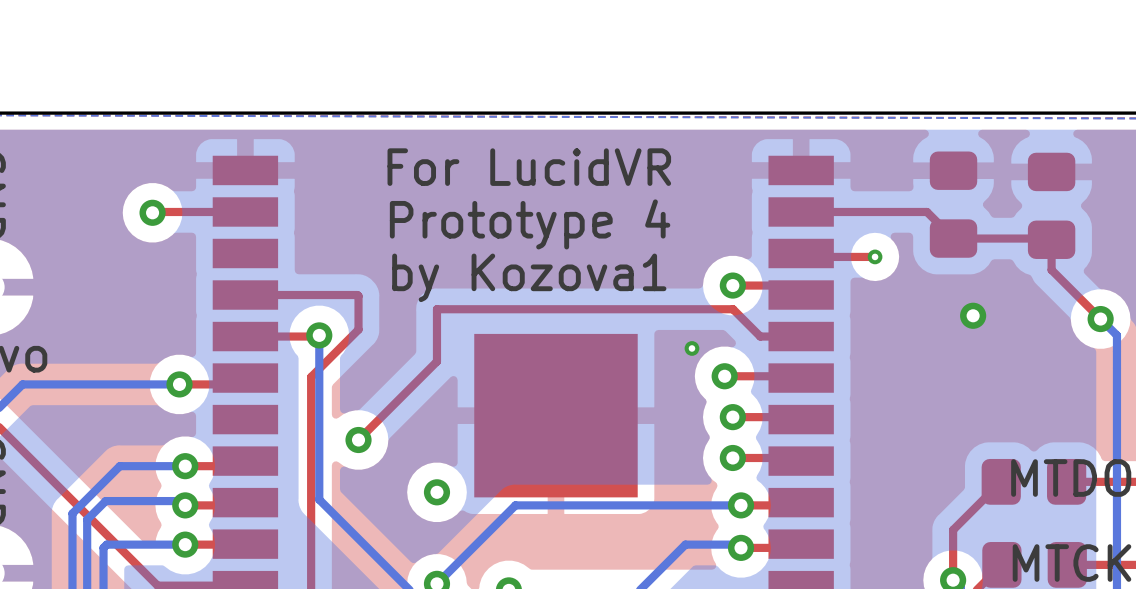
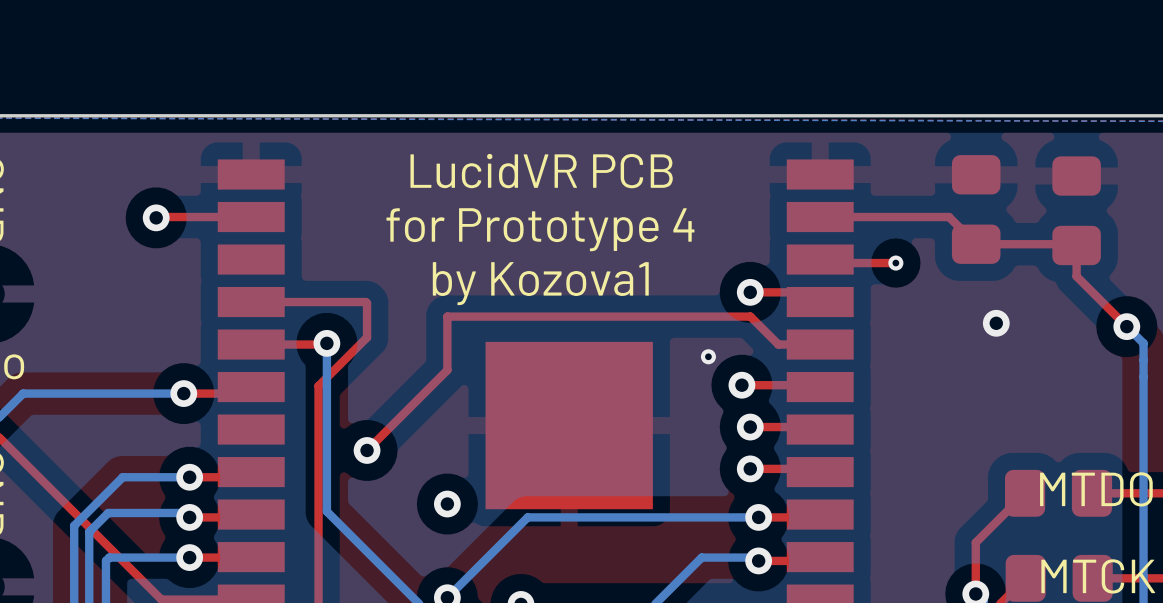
text: For LucidVR (529, 167) -> LucidVR PCB (541, 171)
text: Prototype 4 (530, 224) -> for Prototype 4 (540, 229)

